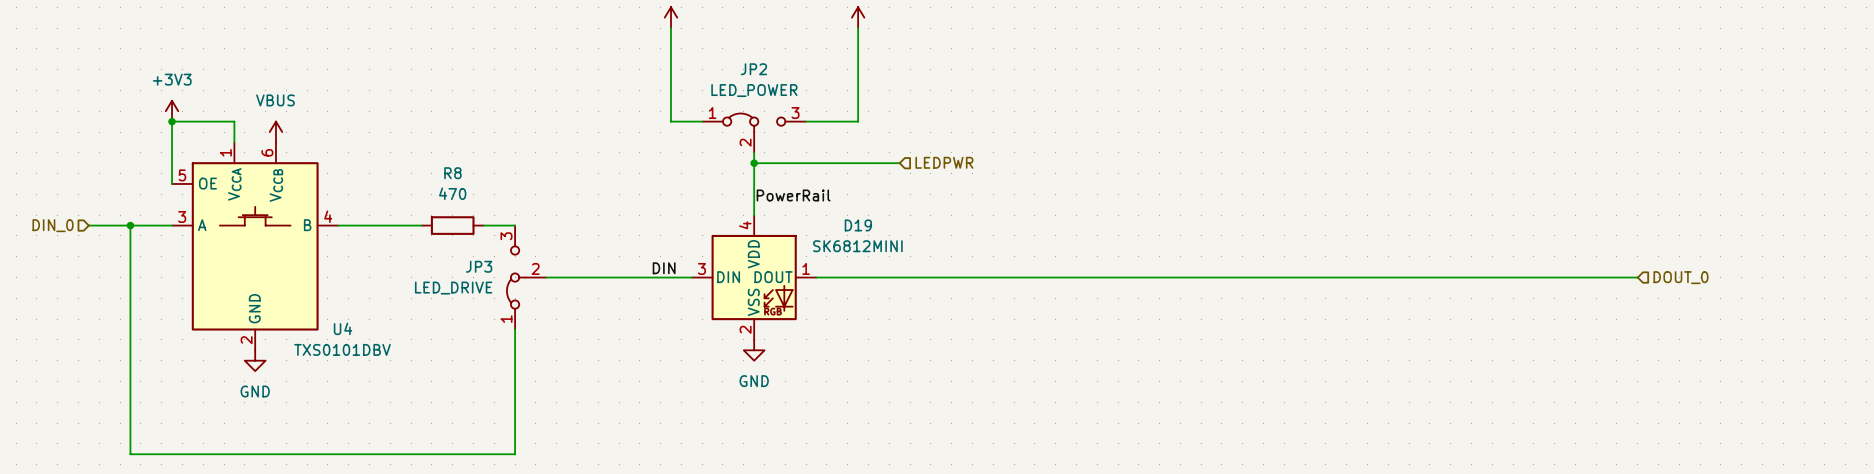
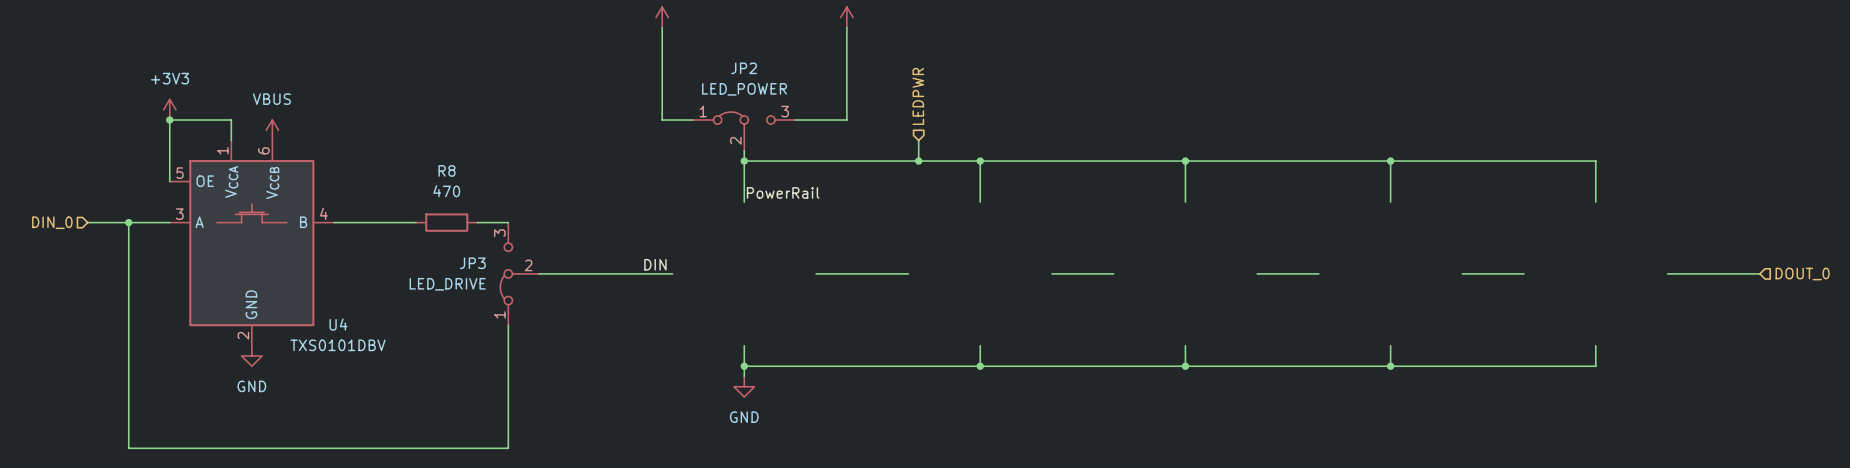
wire: none -> (918, 140) (918, 161)
hierarchical label rotation: 0° (944, 162) -> 90° counterclockwise (918, 96)
hierarchical label position: LEDPWR (944, 162) -> LEDPWR (918, 96)
wire: none -> (887, 161) (1595, 161) (1595, 202)
junction: none -> (918, 161)
wire: none -> (980, 161) (980, 202)
junction: none -> (980, 161)
wire: none -> (1185, 161) (1185, 202)
junction: none -> (1185, 161)
wire: none -> (1390, 161) (1390, 202)
junction: none -> (1390, 161)
wire: (754, 204) (754, 215) -> none
wire: (681, 277) (691, 277) -> none
D19: SK6812MINI (754, 277) -> none
wire: (816, 277) (826, 277) -> none
wire: (920, 277) (1066, 277) -> none
wire: (1128, 277) (1273, 277) -> none
wire: (1336, 277) (1481, 277) -> none
wire: (1544, 277) (1637, 277) -> (1667, 273) (1759, 273)
hierarchical label position: DOUT_0 (1681, 277) -> DOUT_0 (1802, 274)
wire: none -> (744, 345) (744, 376)
power symbol position: GND (754, 350) -> GND (744, 386)
wire: none -> (980, 345) (980, 366)
wire: none -> (1185, 345) (1185, 366)
wire: none -> (1390, 345) (1390, 366)
wire: none -> (1595, 345) (1595, 366) (744, 366)
junction: none -> (744, 366)
junction: none -> (980, 366)
junction: none -> (1185, 366)
junction: none -> (1390, 366)

